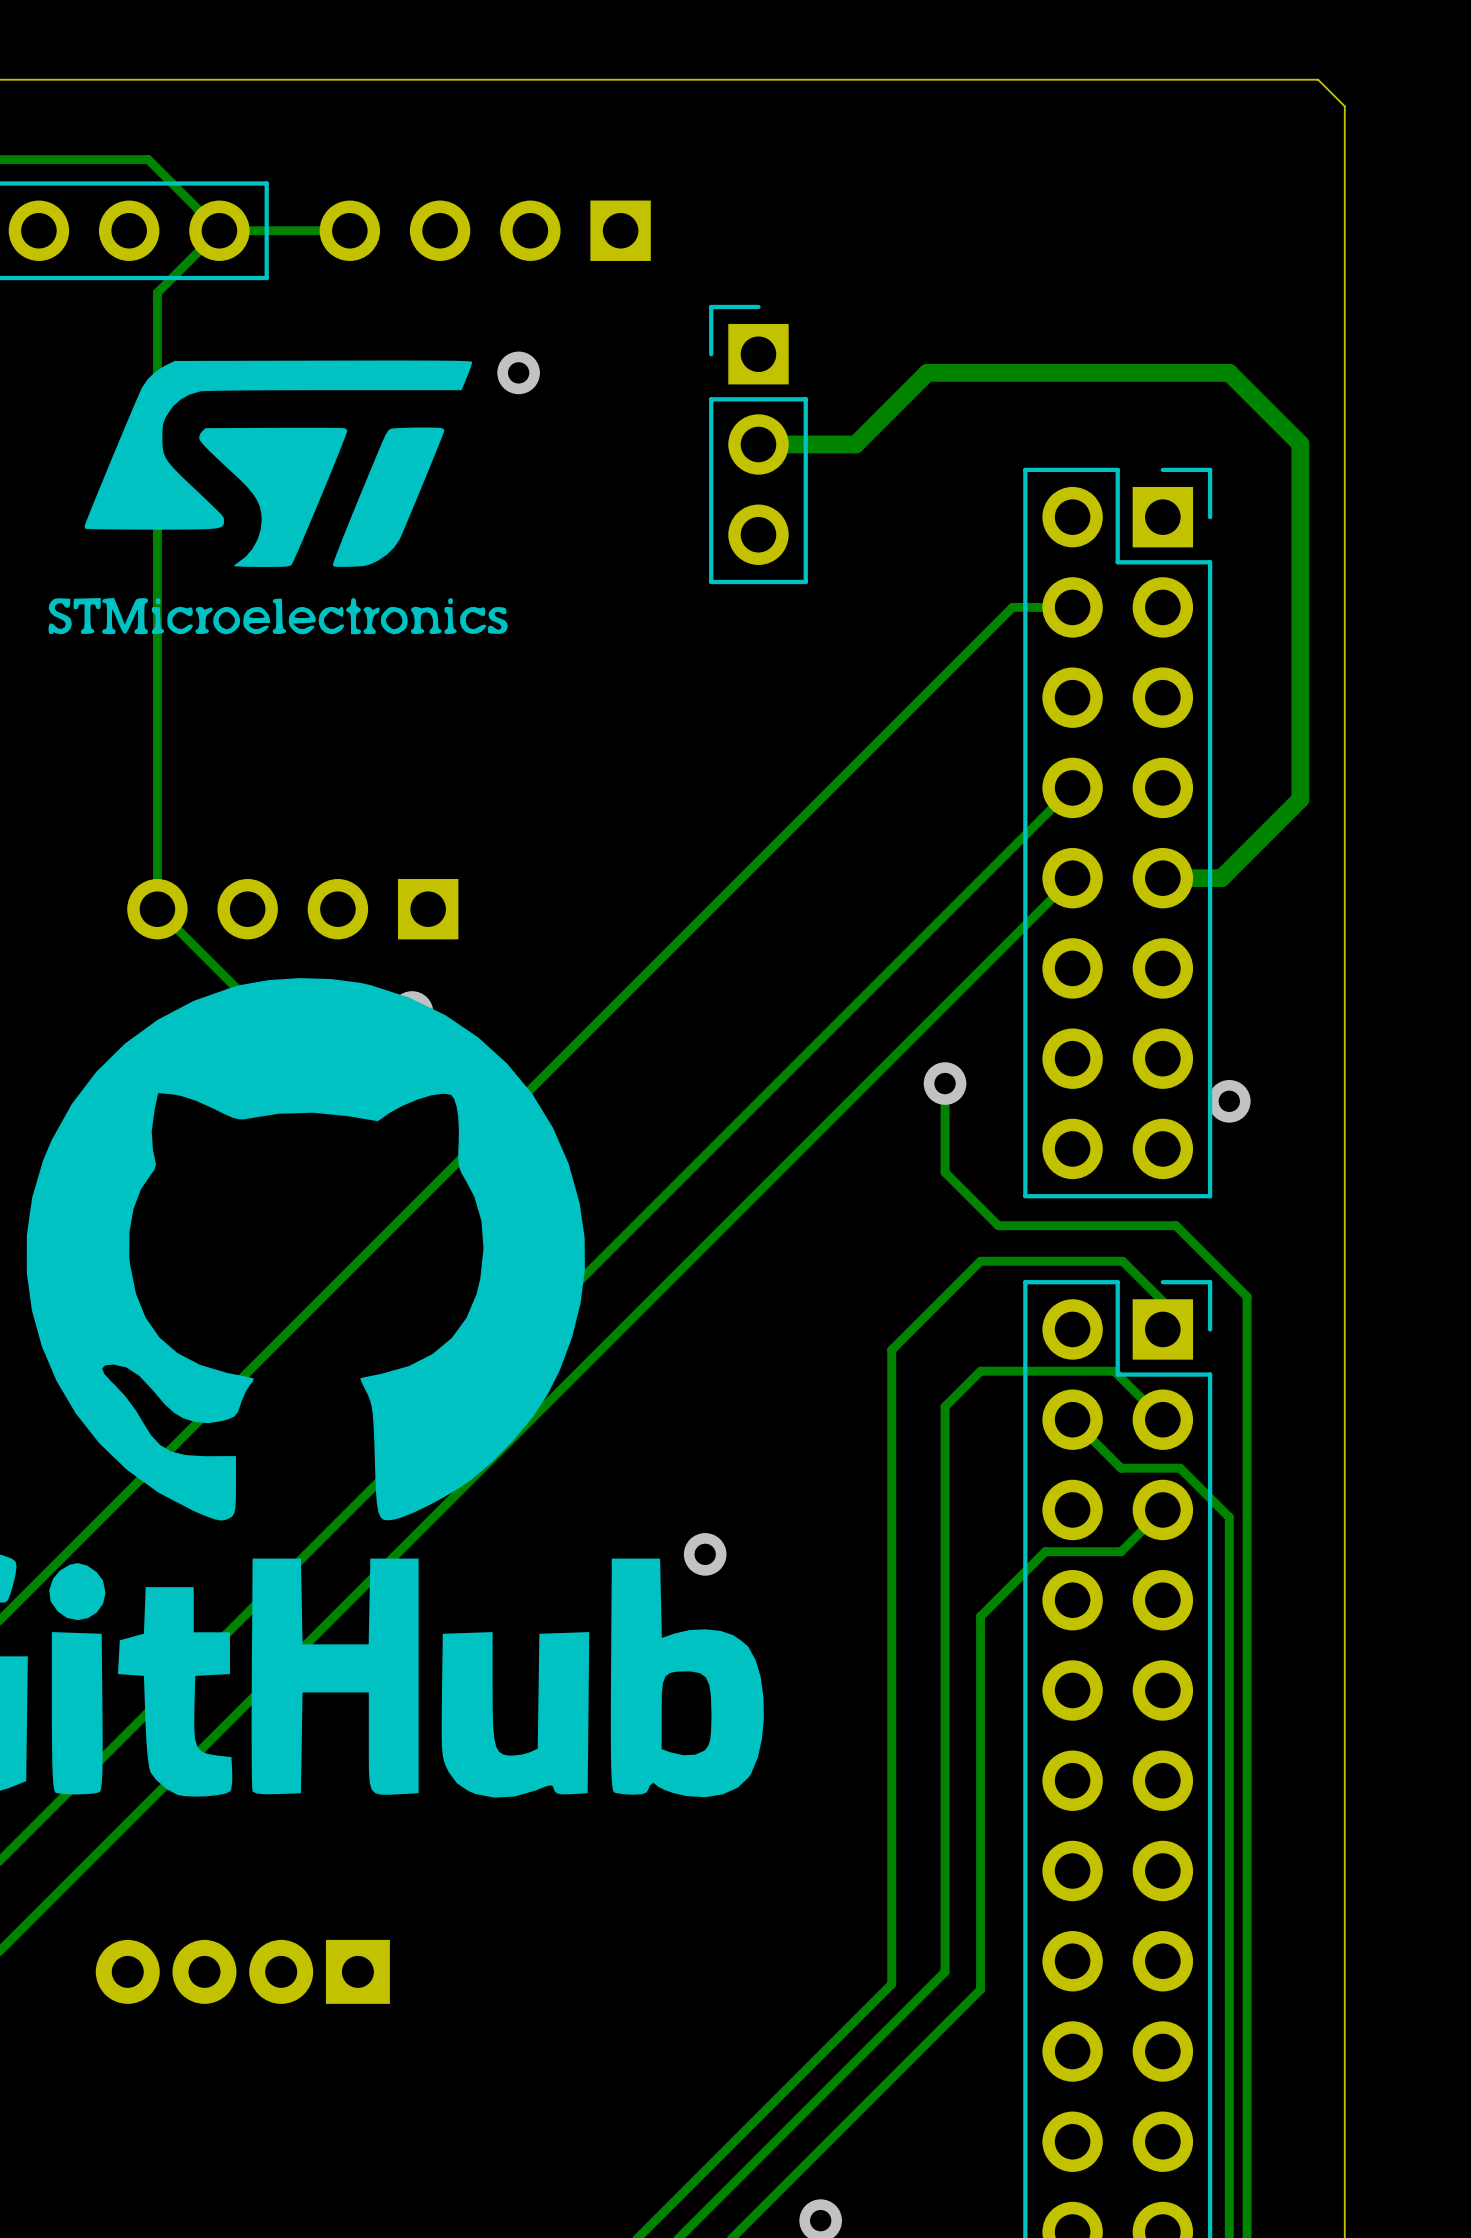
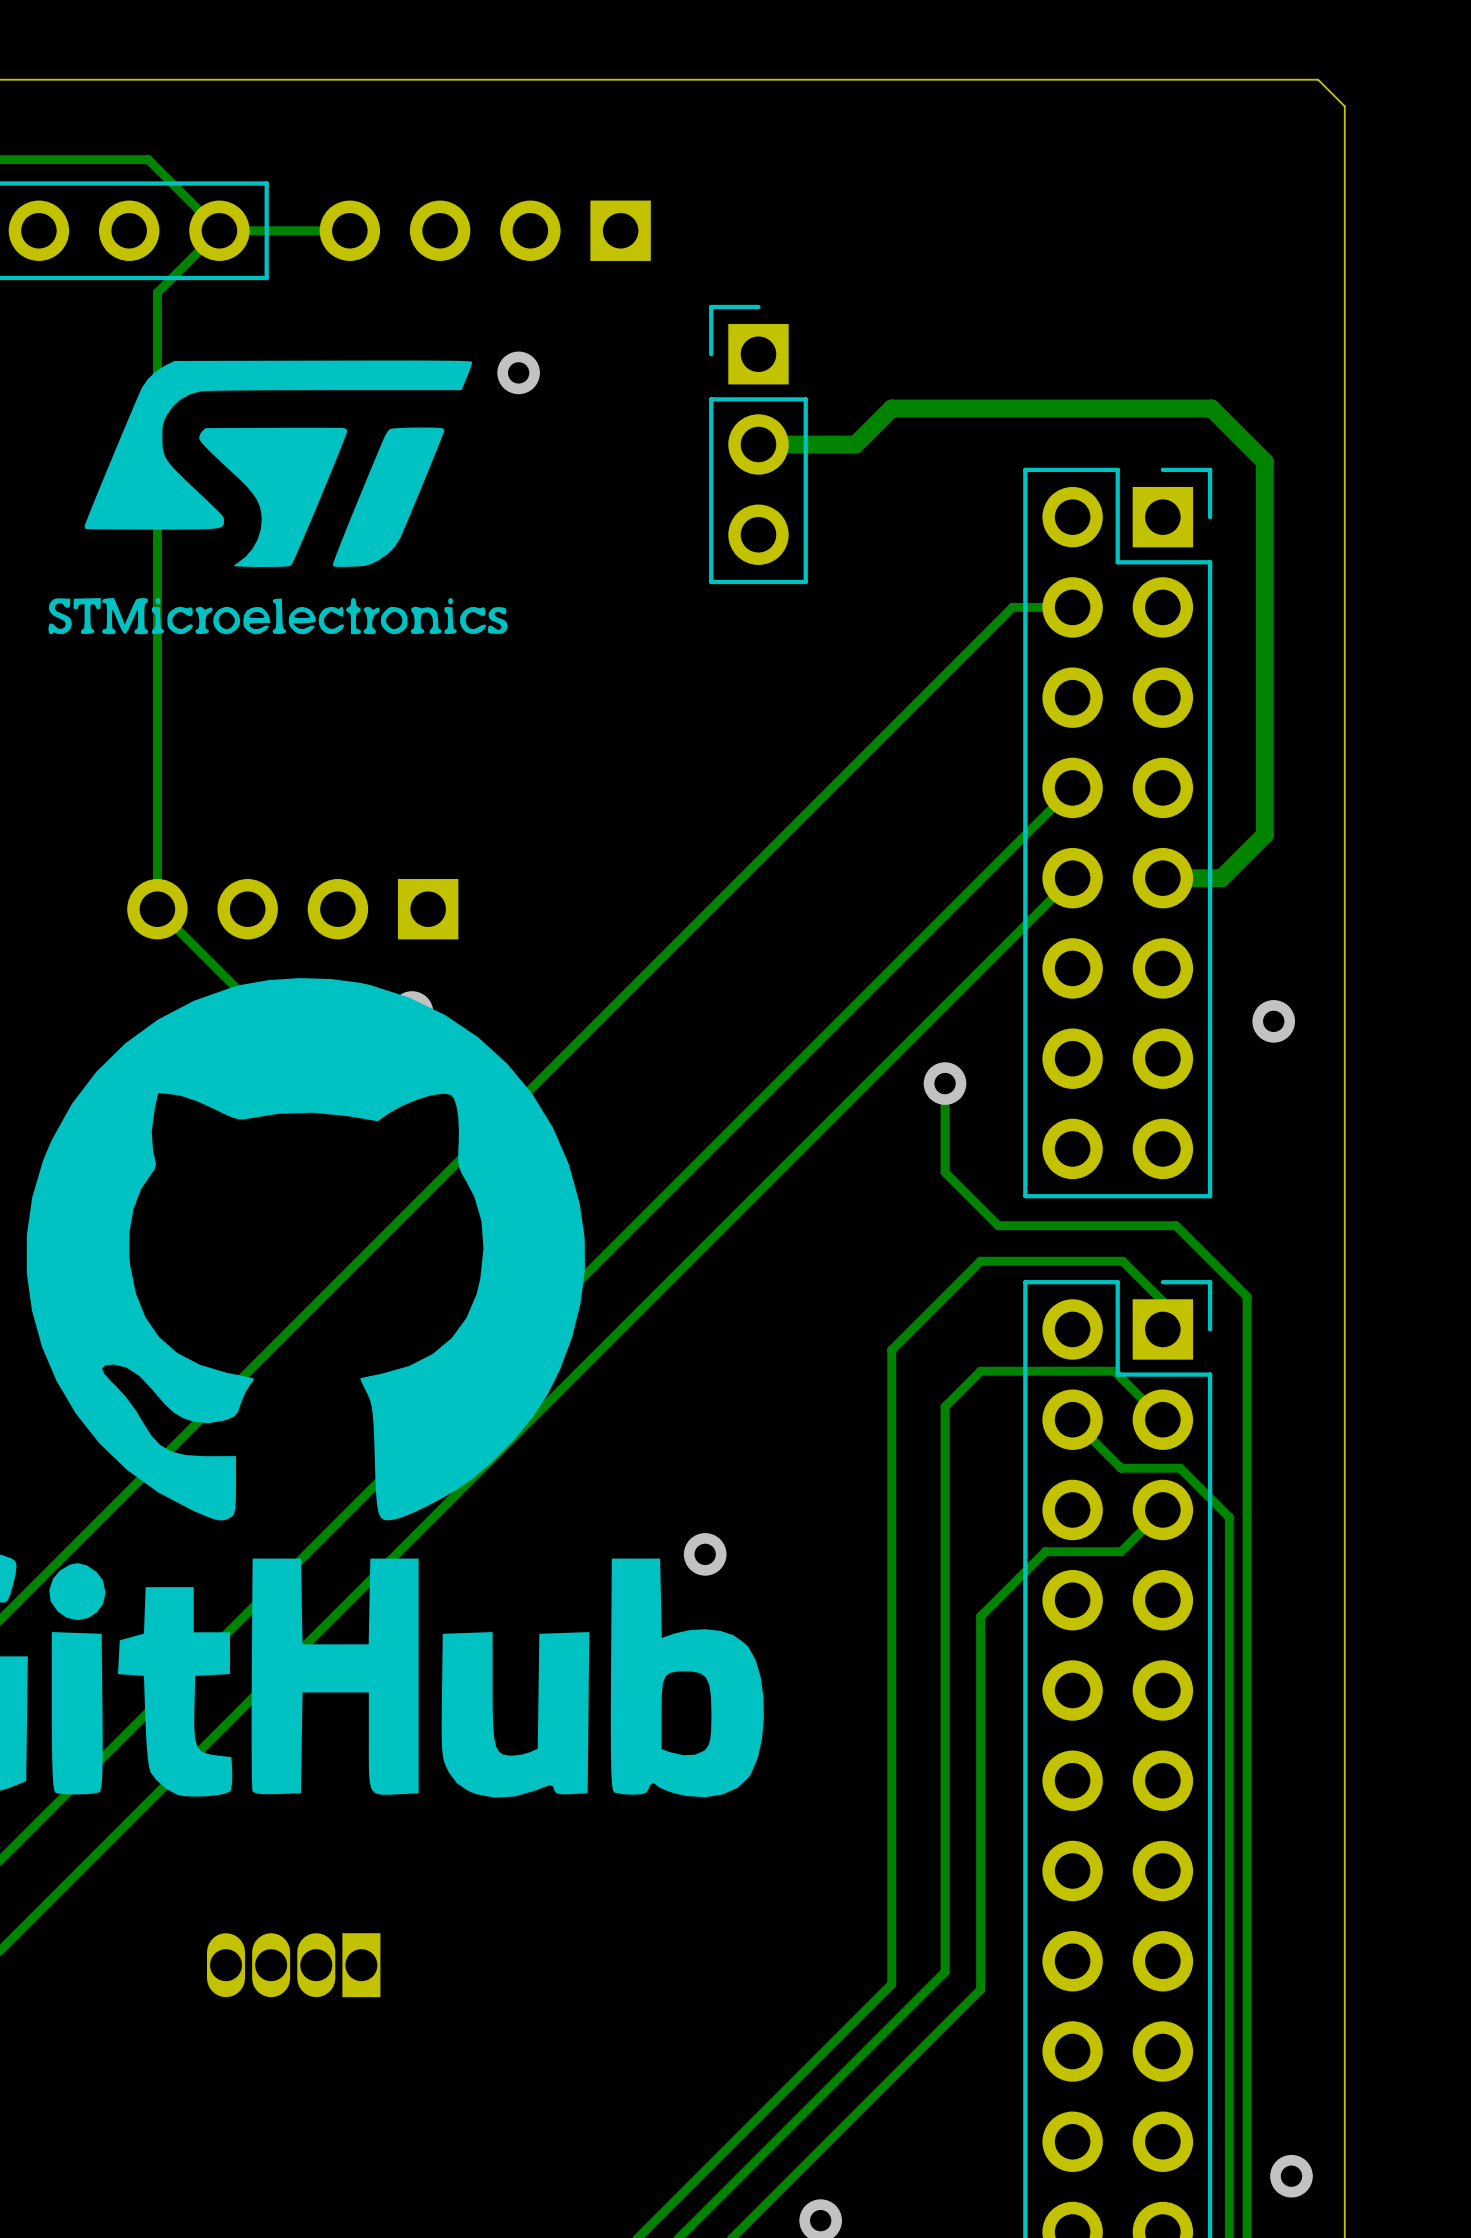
track: (891, 408) (927, 372) (1229, 372) (1300, 443) (1300, 799) (1264, 834) -> (891, 408) (1211, 408) (1264, 461) (1264, 834)
via position: (1229, 1101) -> (1273, 1021)
part: none -> (293, 1965)
part: (242, 1971) -> none
via: none -> (1291, 2176)

